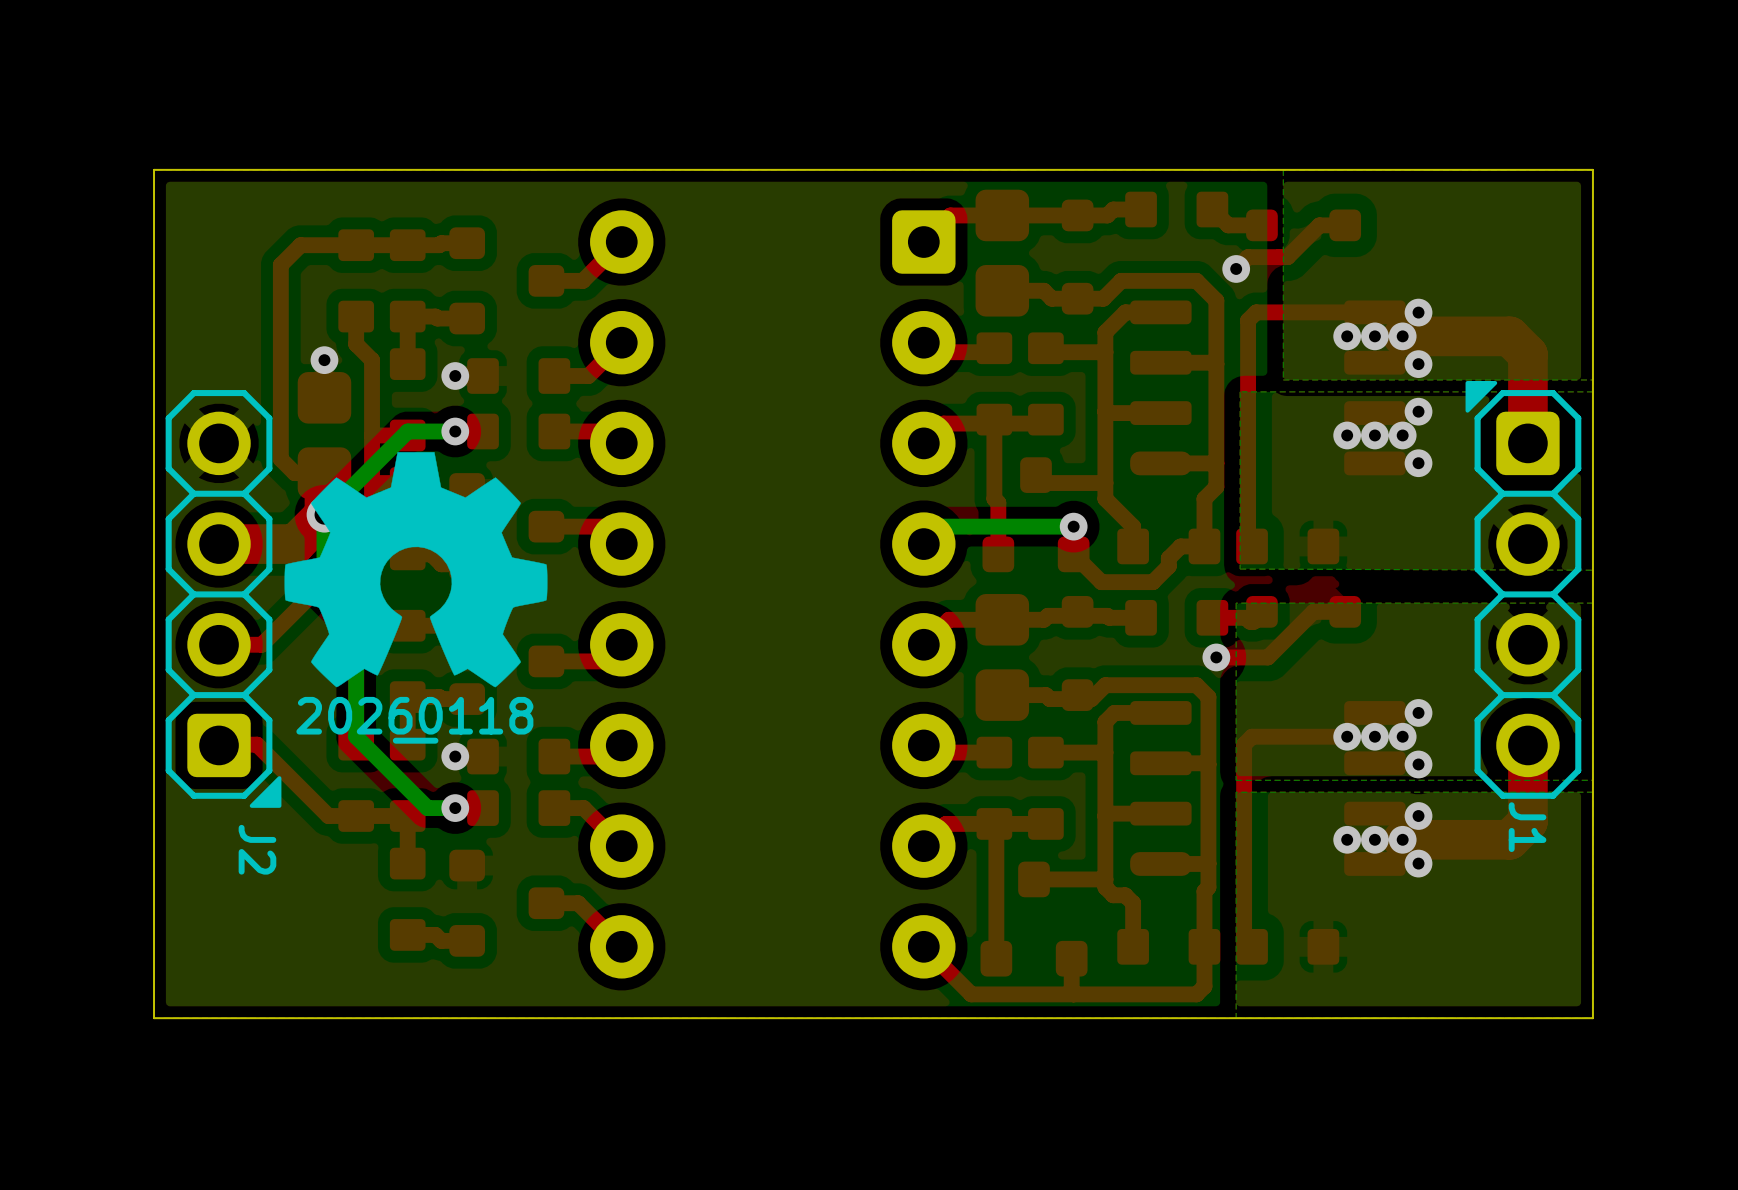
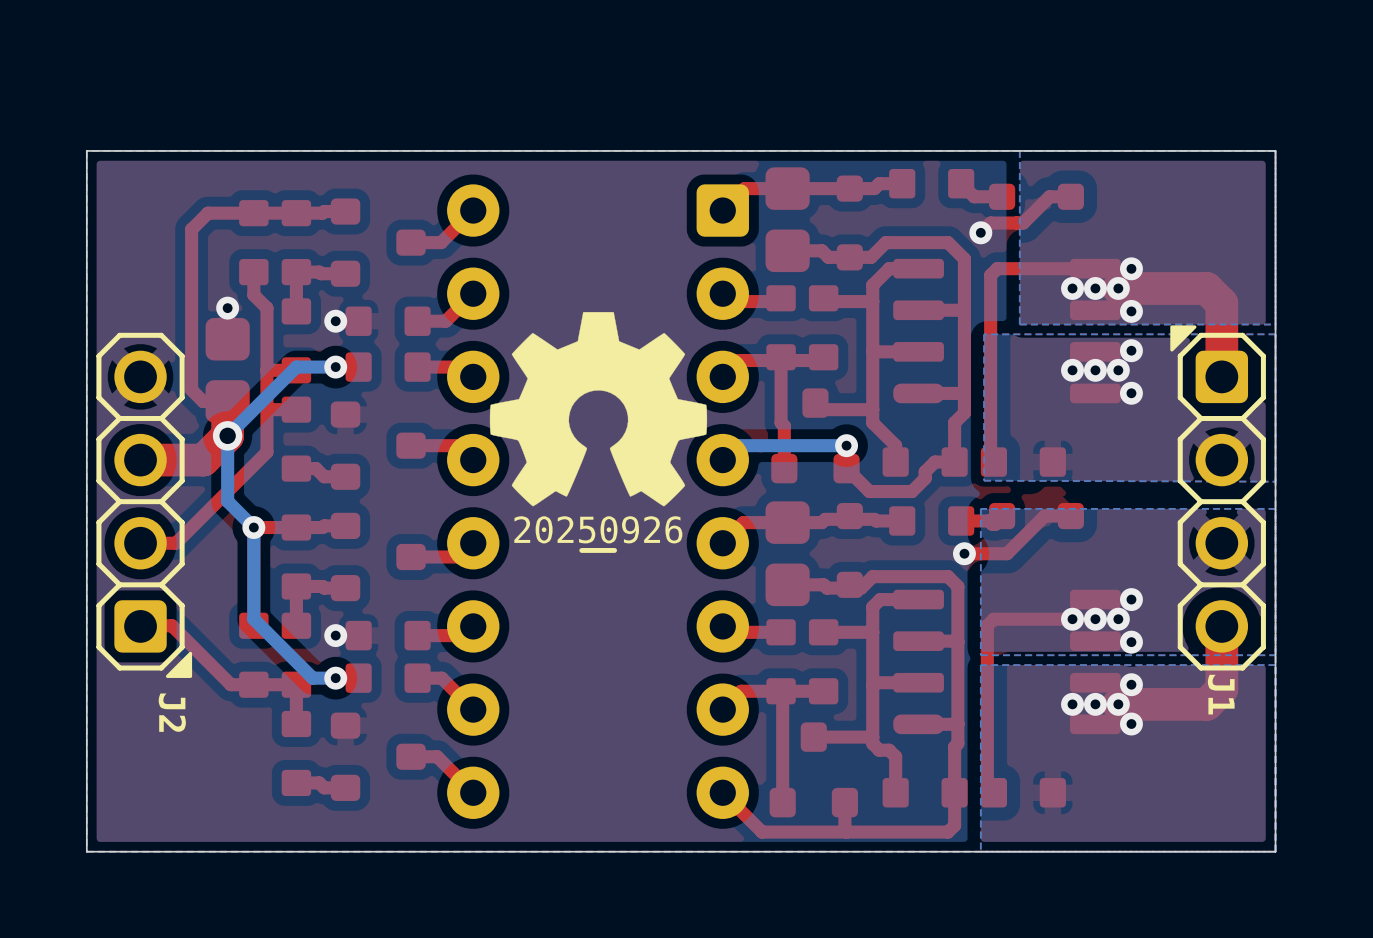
drawing position: (416, 569) -> (598, 409)
drawing: none -> [579, 547, 618, 553]
drawing: [392, 737, 439, 744] -> none

